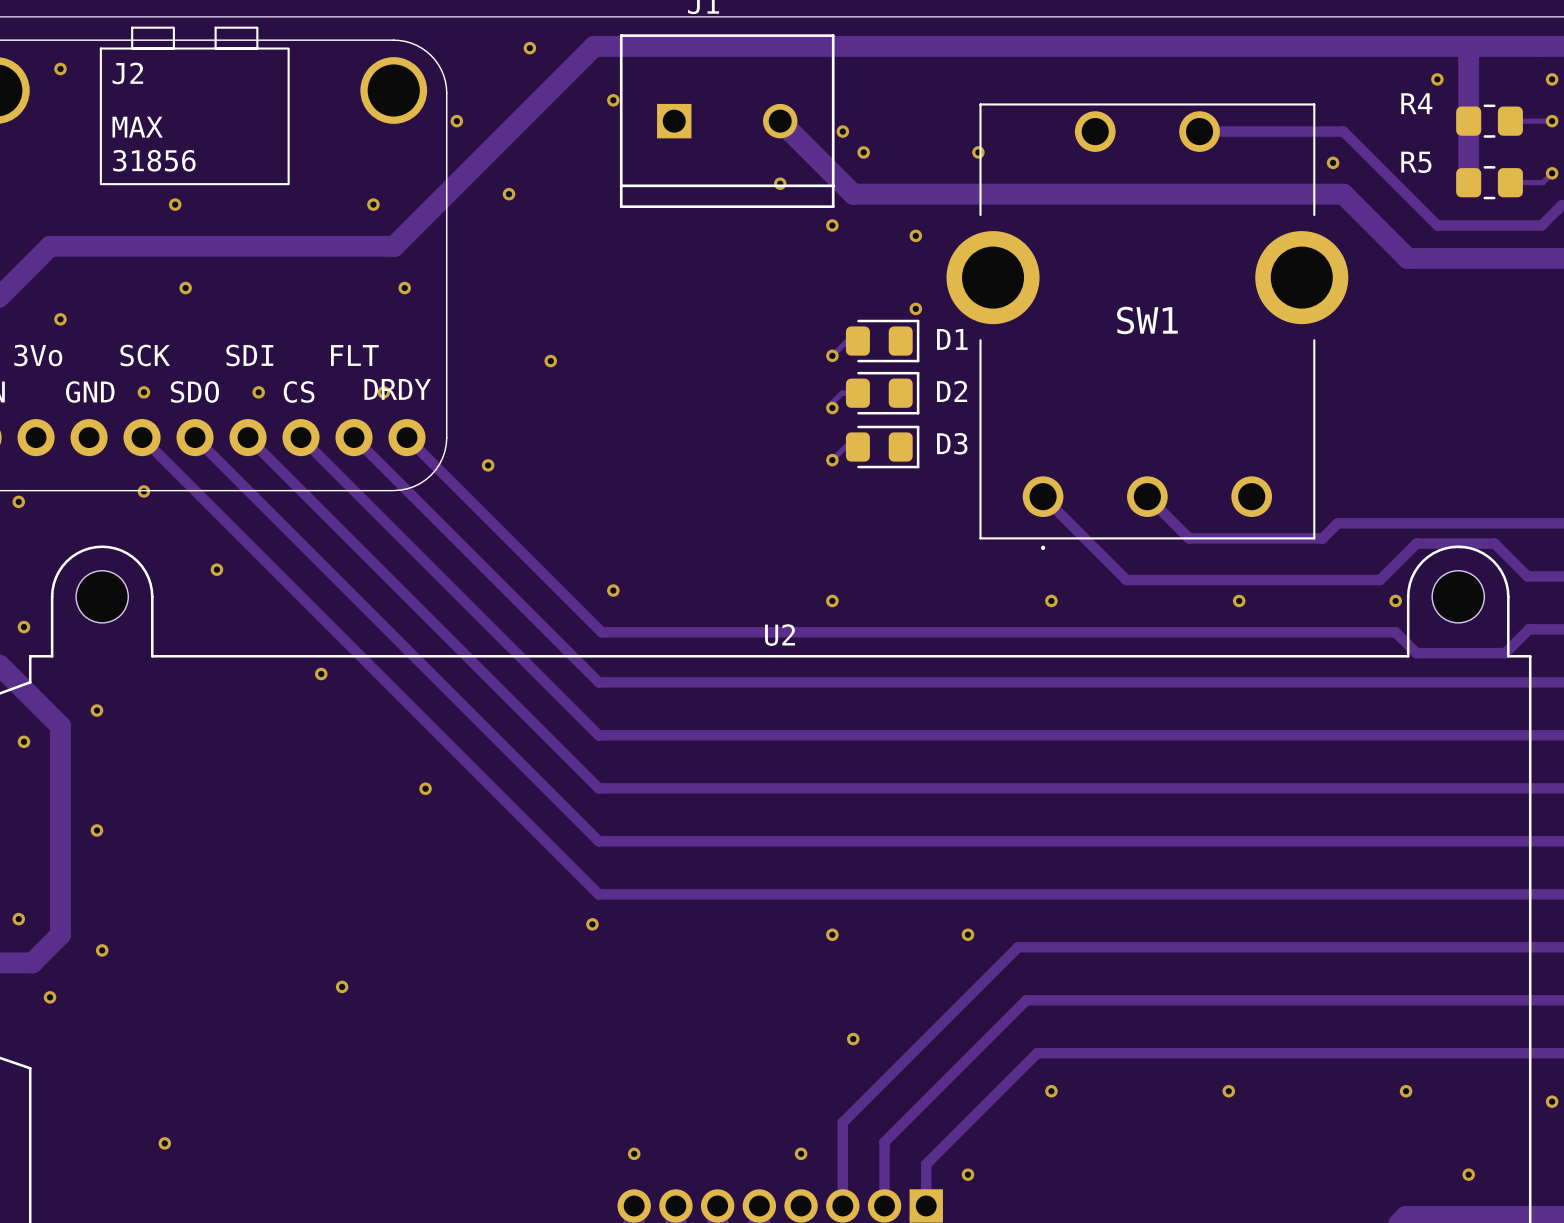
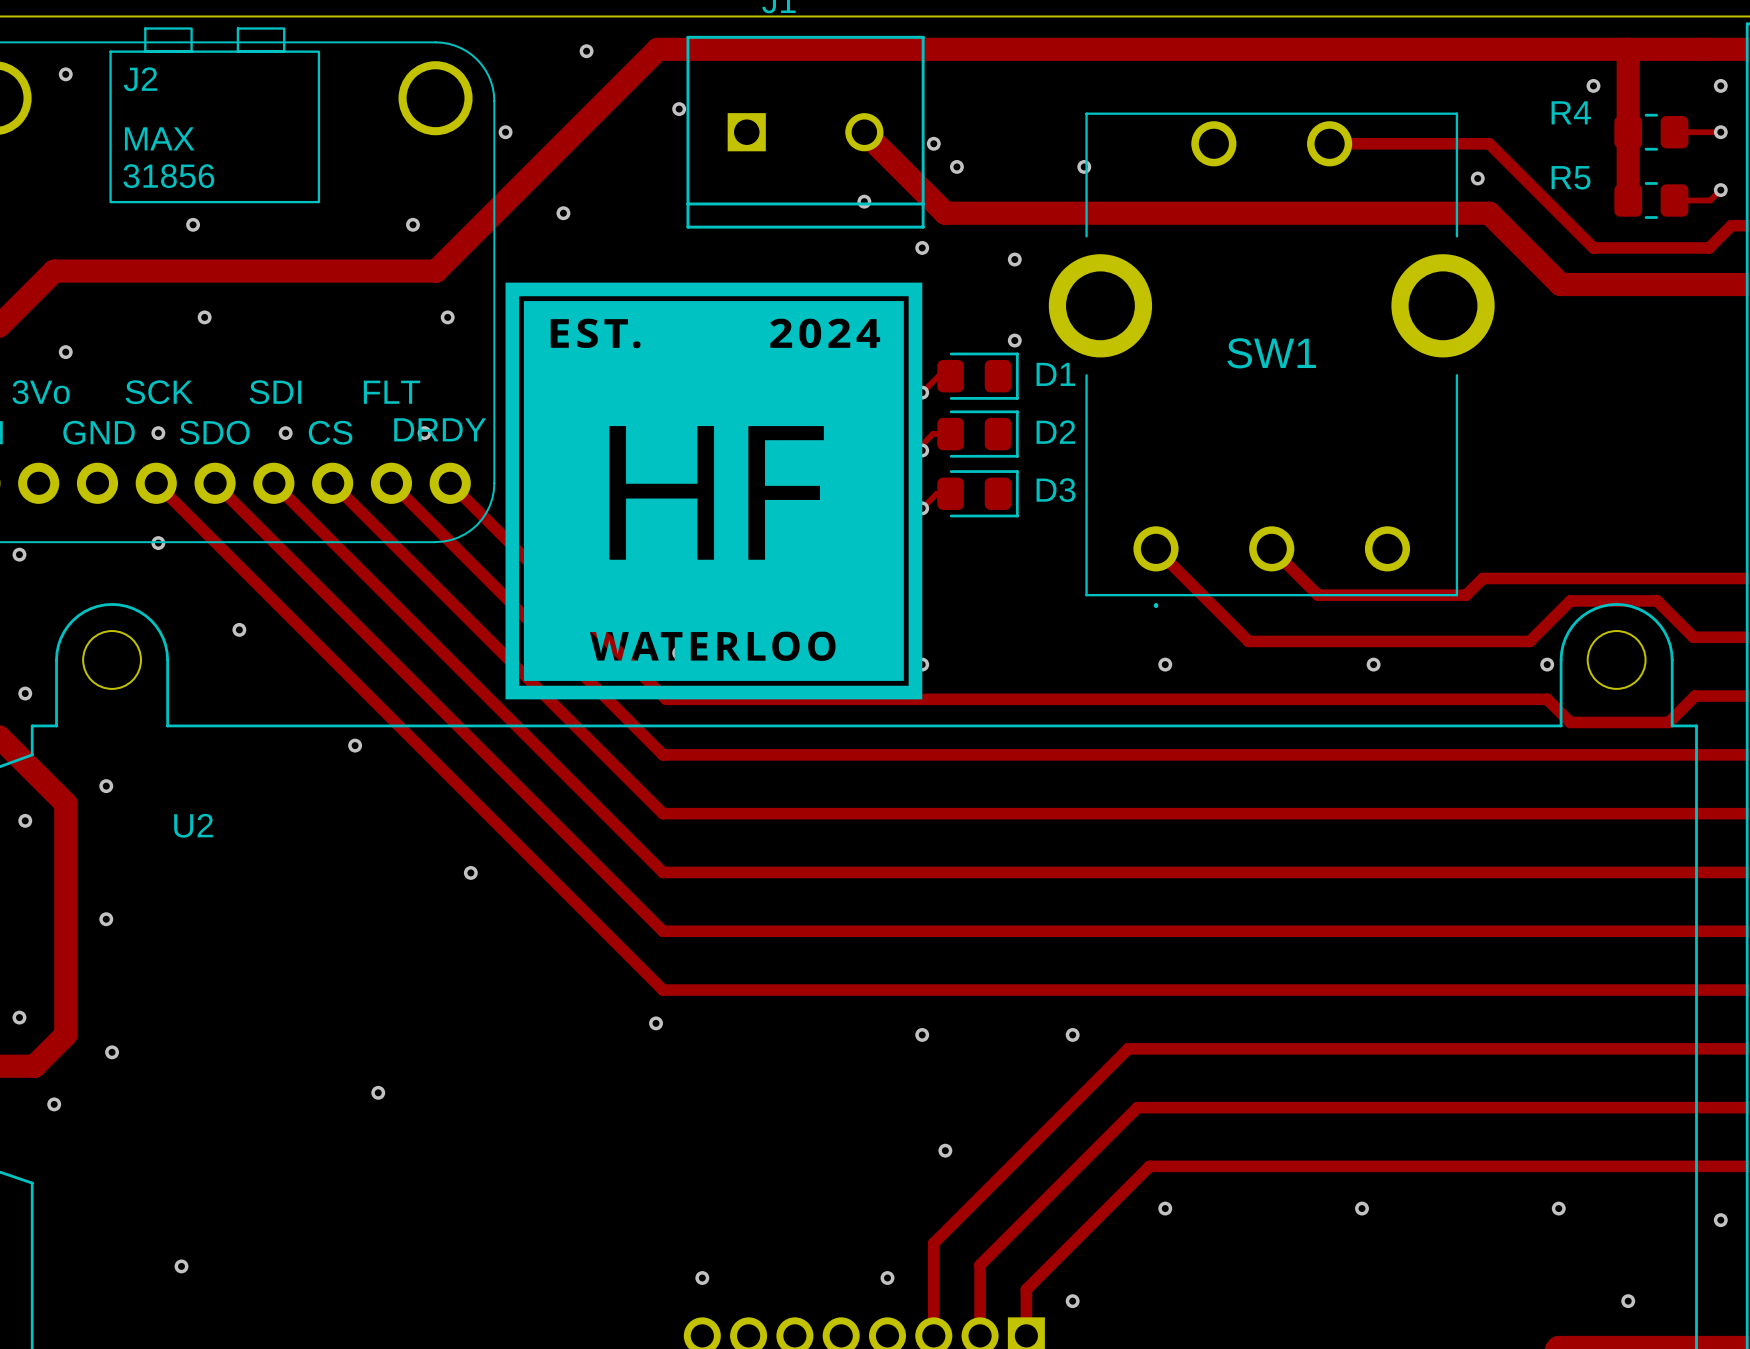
drawing: none -> [505, 282, 923, 700]
U2 name position: U2 (780, 635) -> U2 (193, 825)

